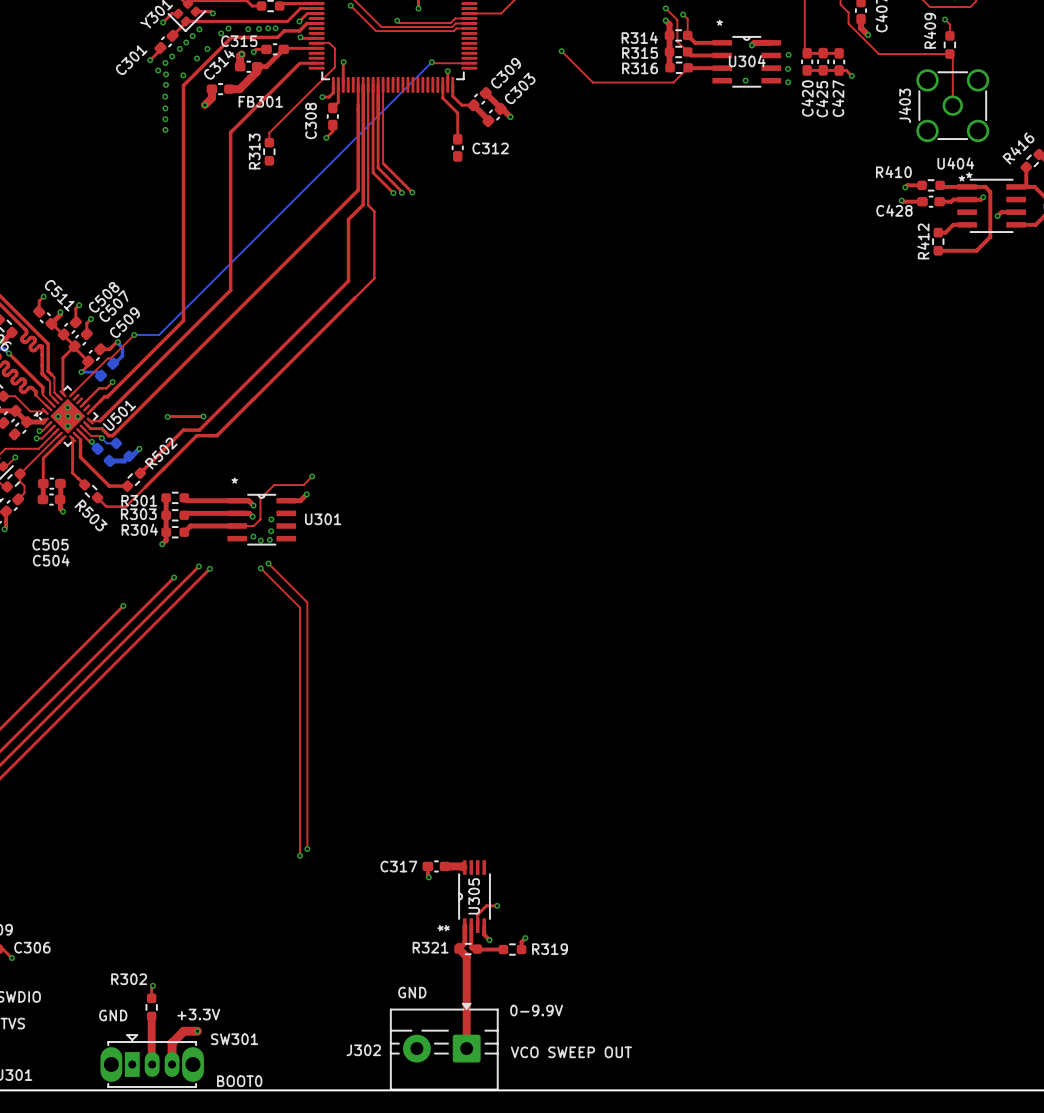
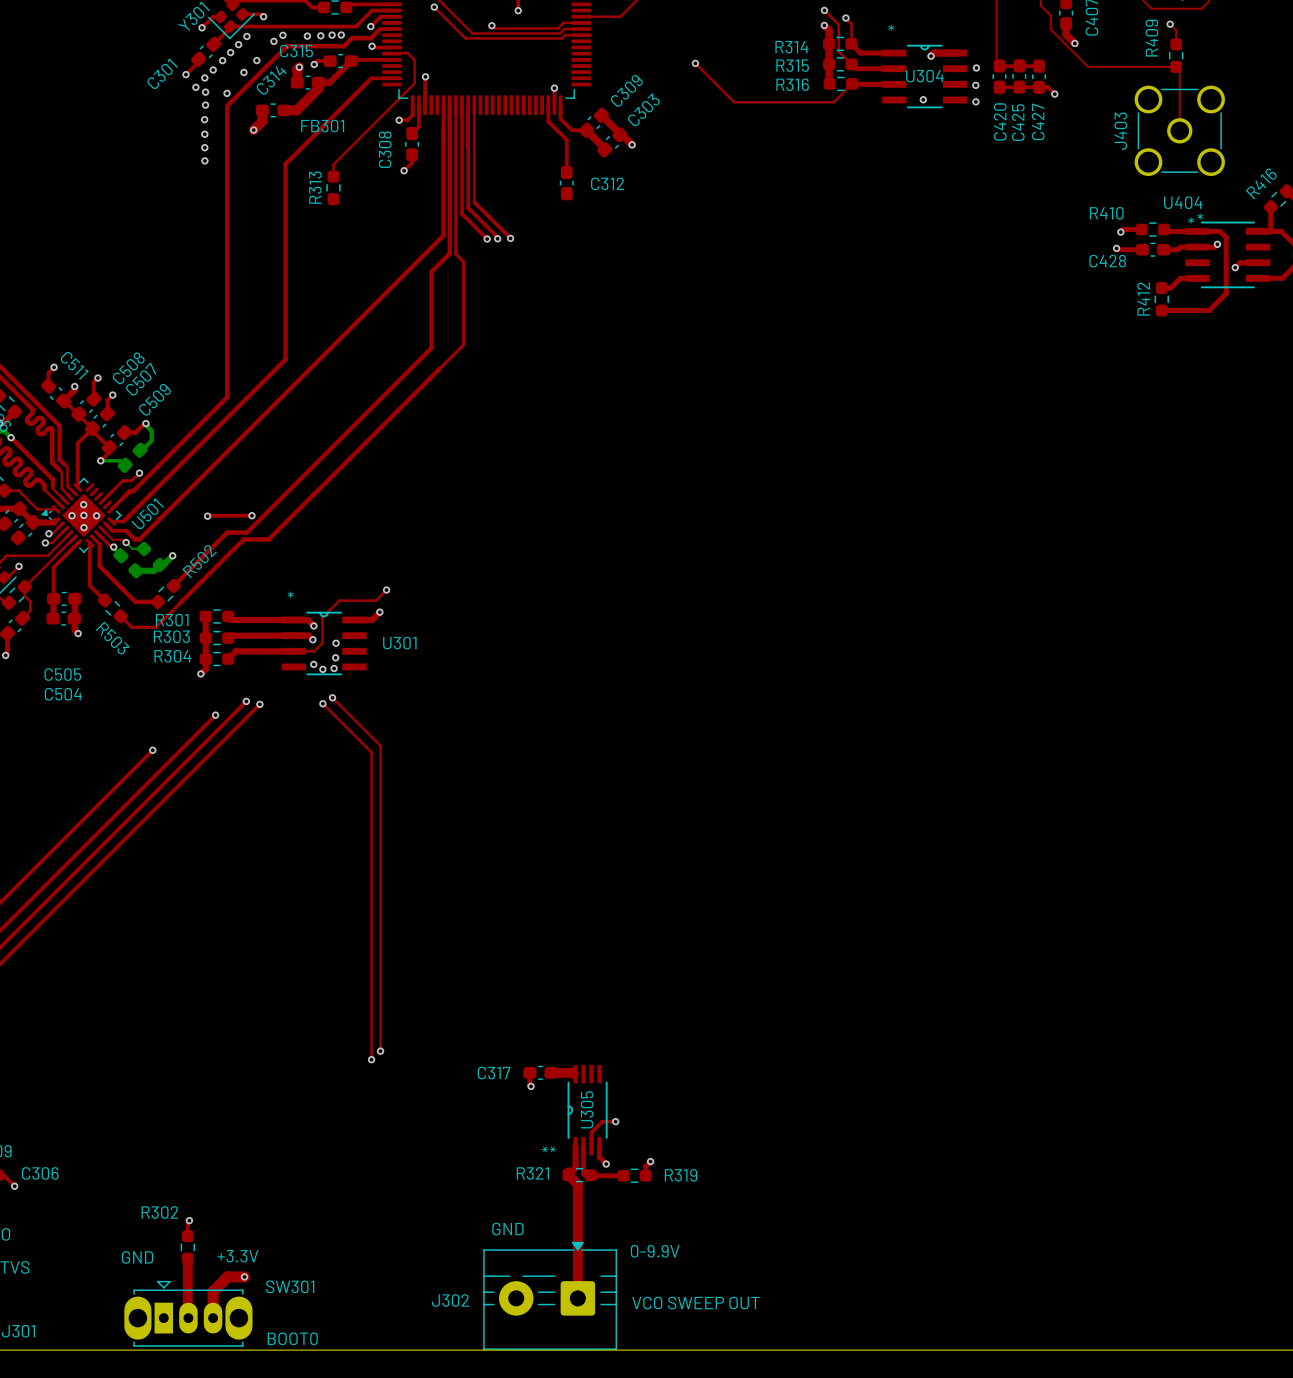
top track: (431, 62) (469, 63) -> none
bottom track: (431, 62) (159, 334) (134, 334) -> none
via: (431, 62) -> none
top track: (134, 334) (72, 393) -> none
via: (134, 334) -> none

